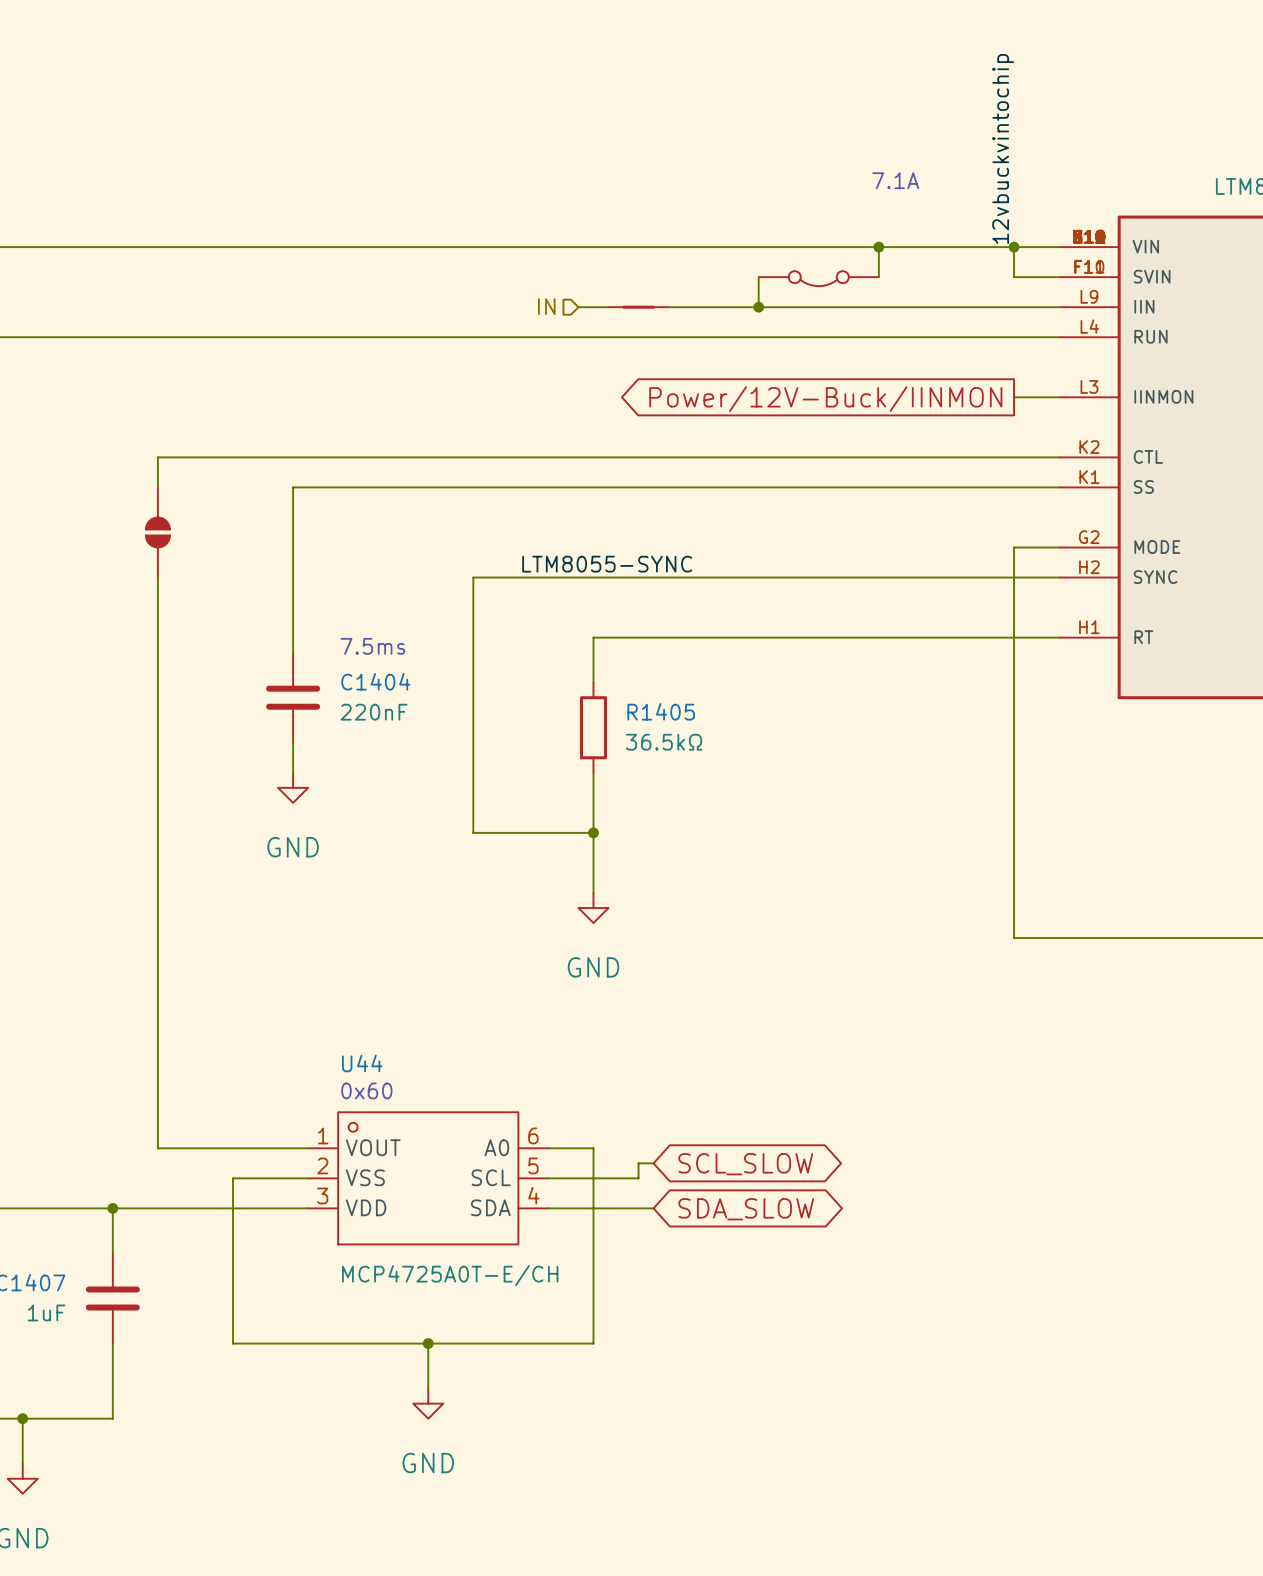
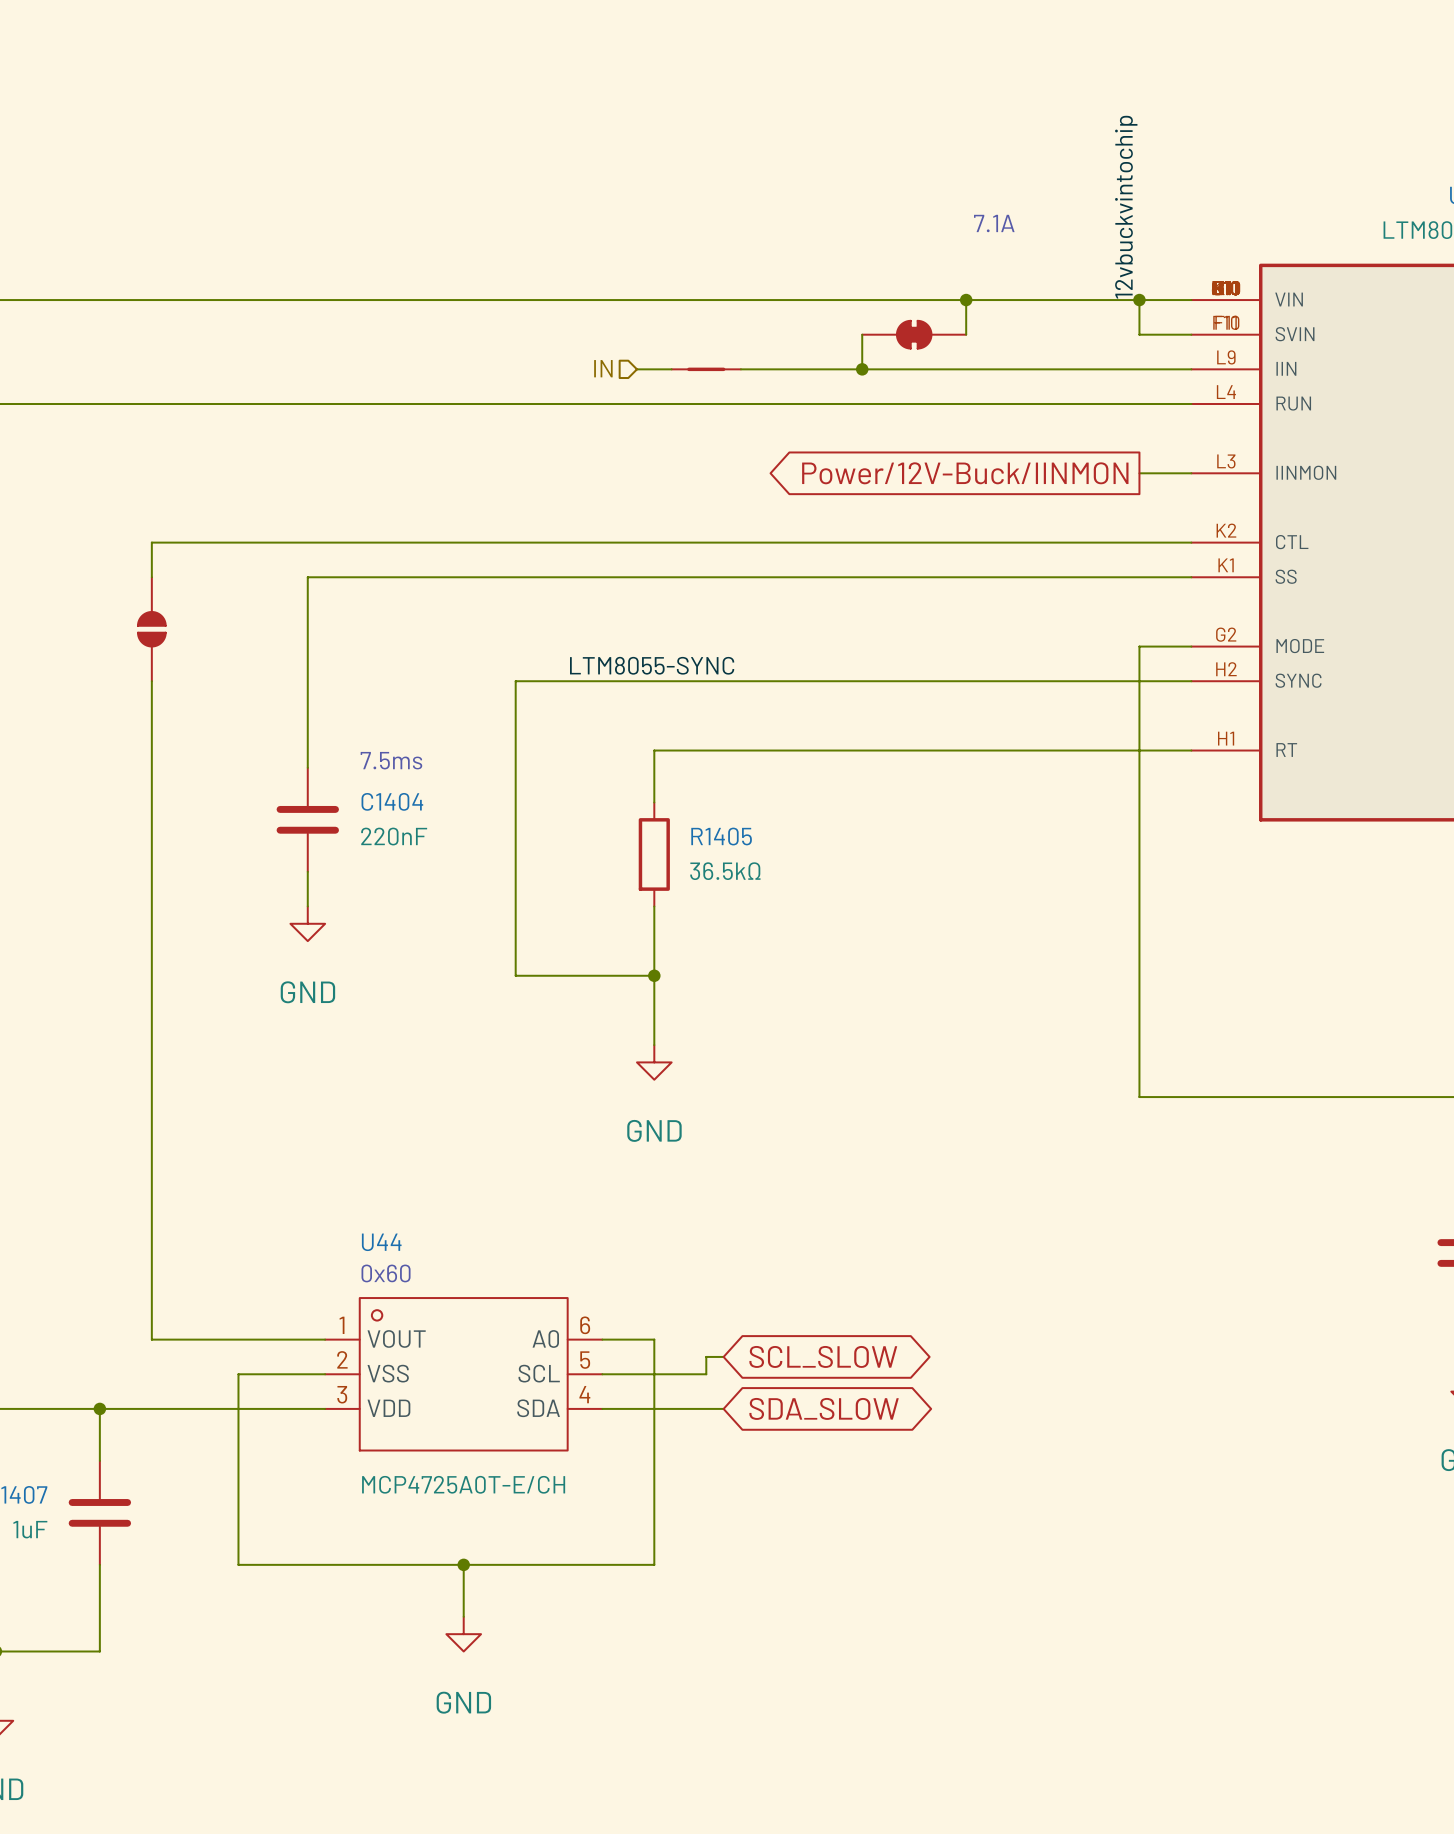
wire: (878, 247) (878, 277) -> (966, 300) (966, 334)
junction position: (878, 247) -> (966, 300)
part symbol: [758, 271, 879, 287] -> [862, 320, 967, 349]
wire: (758, 277) (758, 307) -> (862, 334) (862, 369)
junction position: (758, 307) -> (862, 369)

